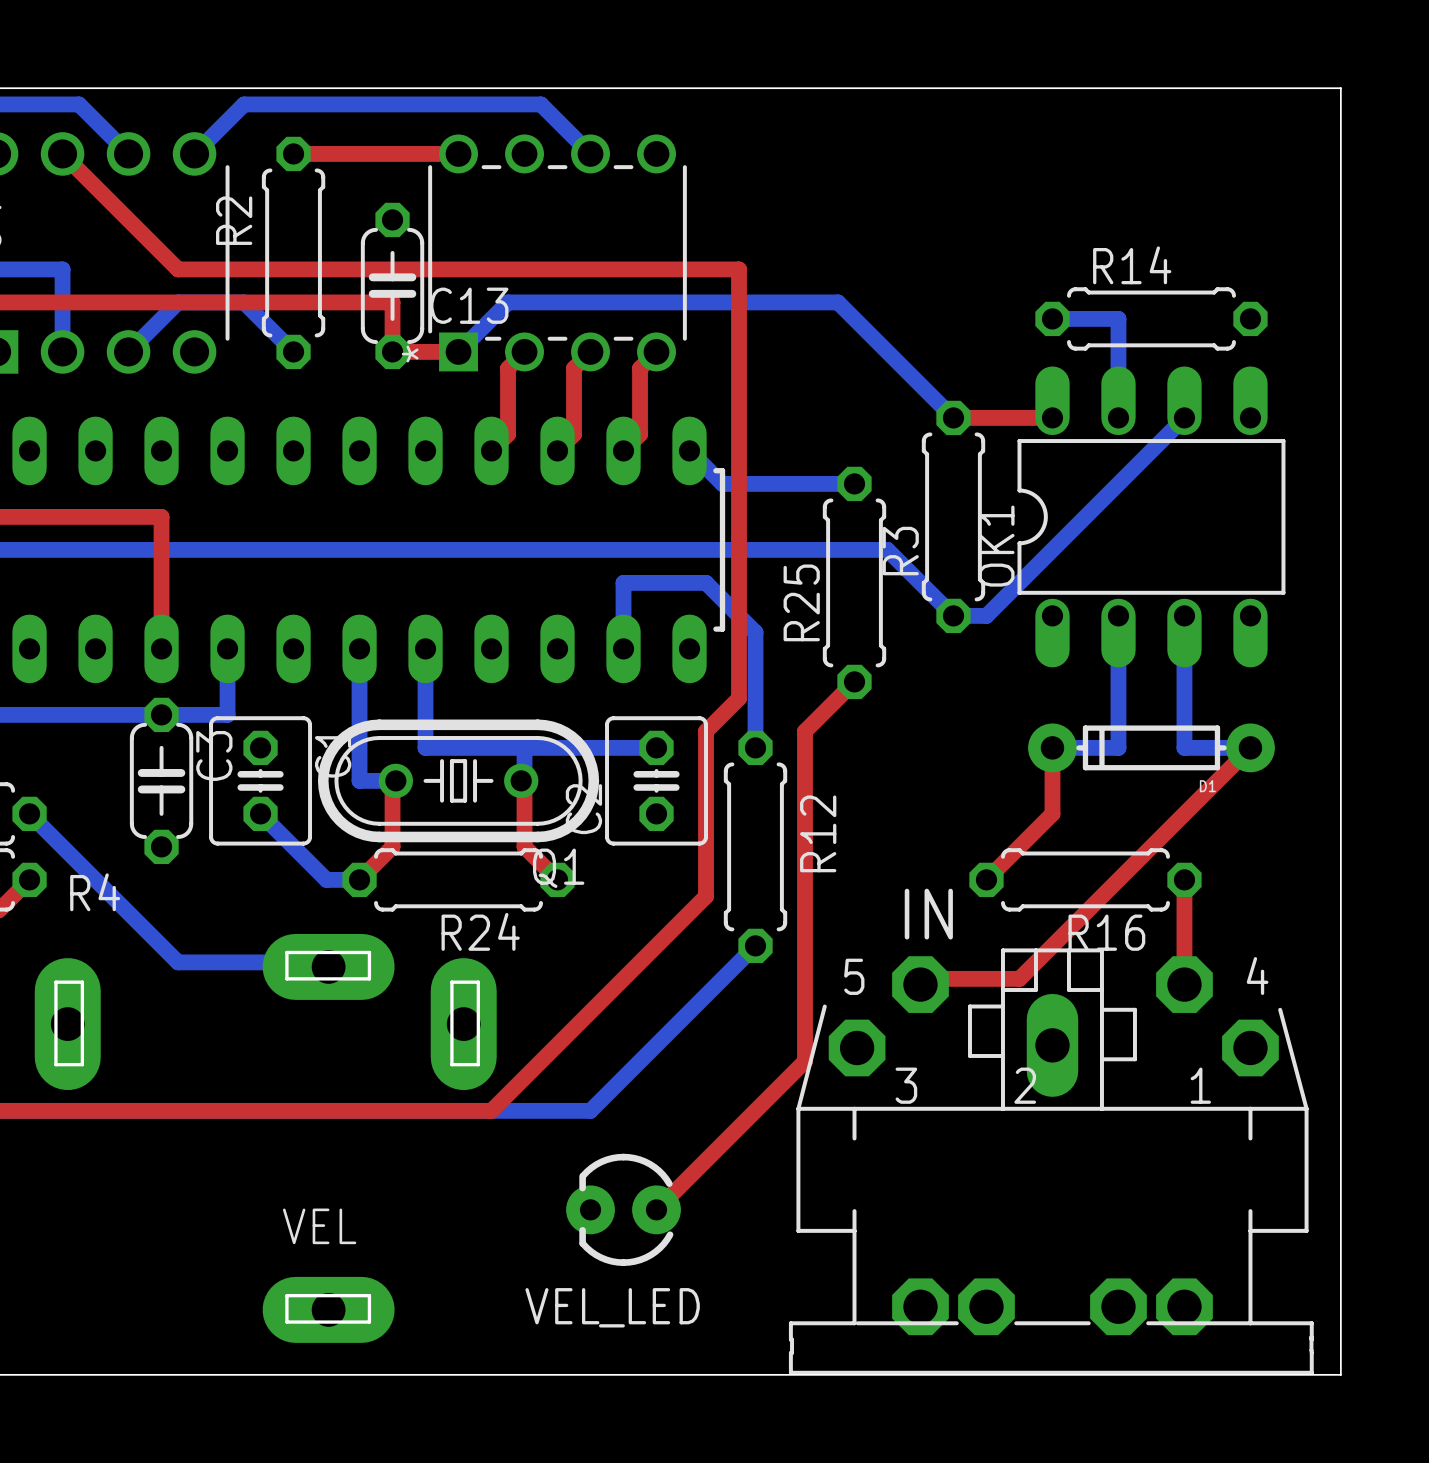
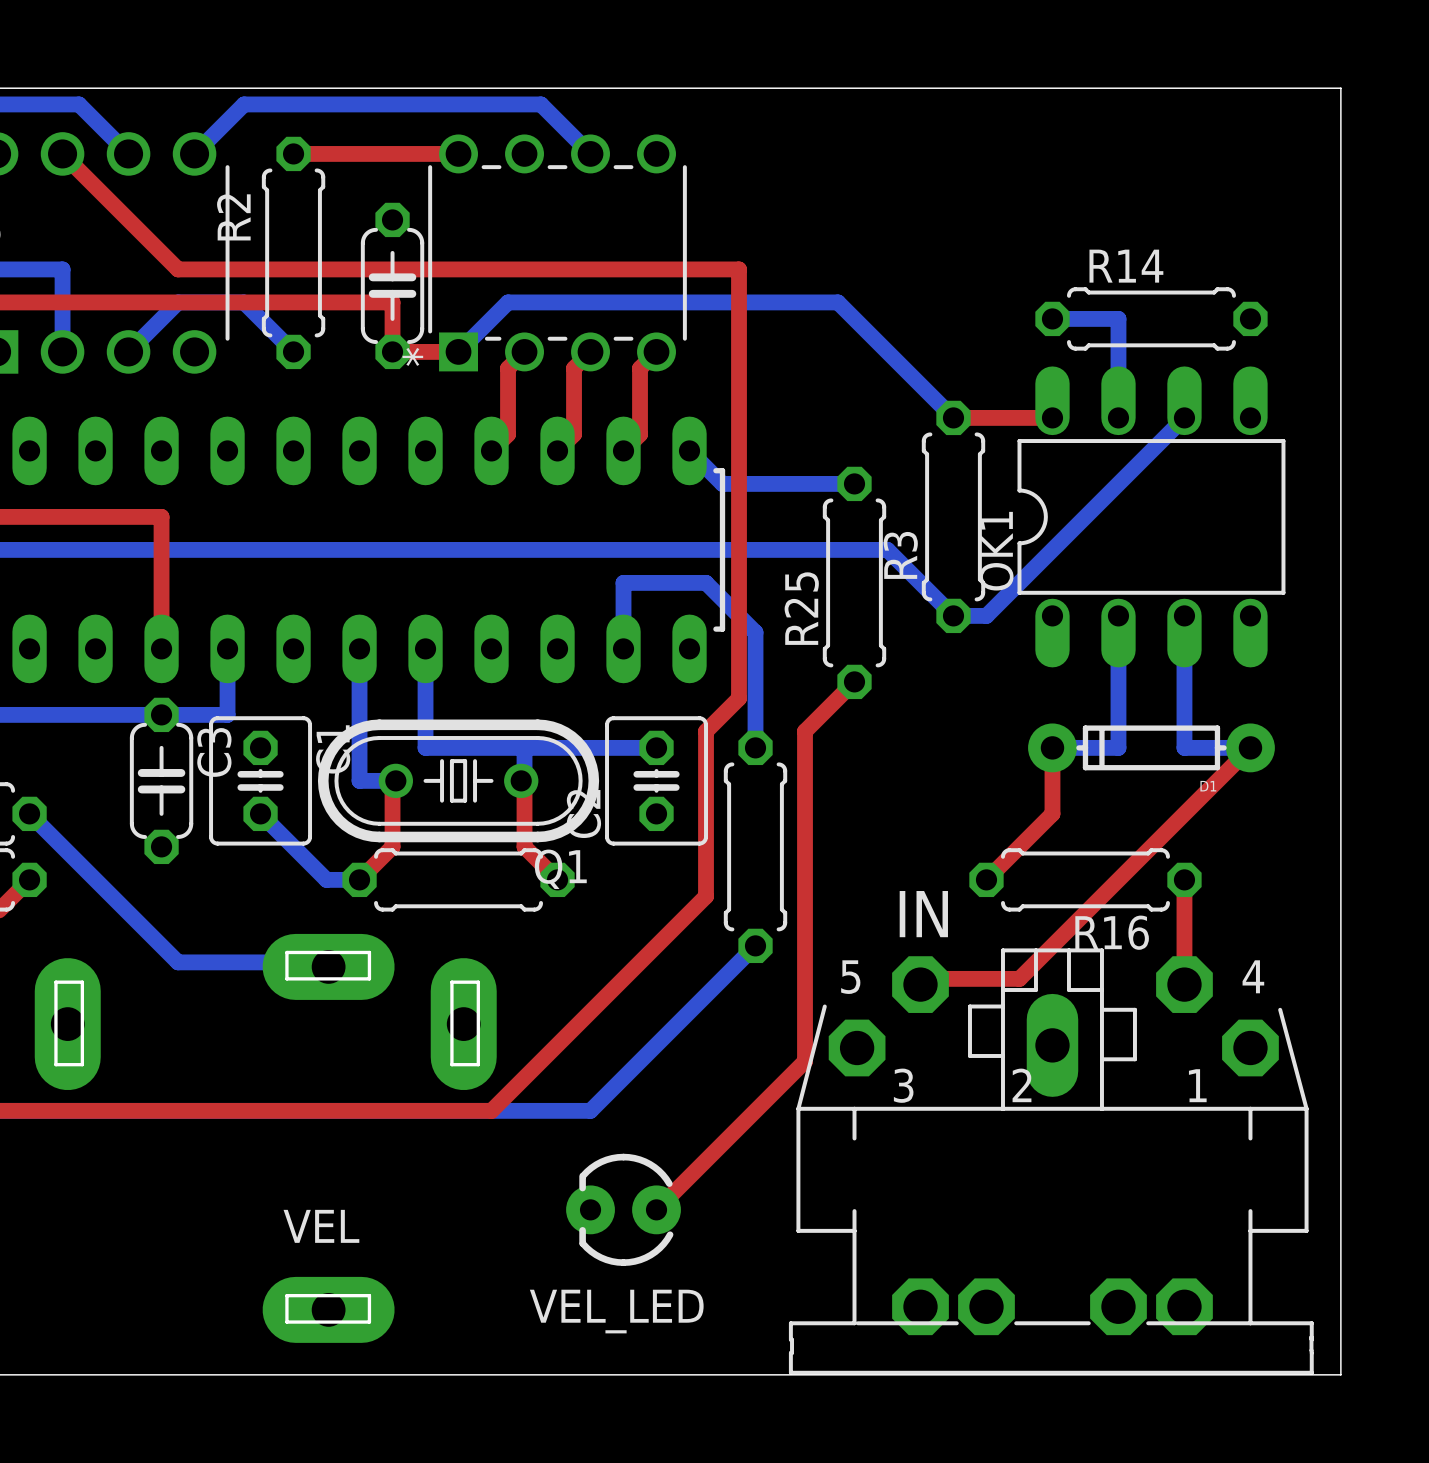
C13 name: C13 (469, 305) -> none
R12 name: R12 (818, 833) -> none
R4 name: R4 (95, 892) -> none
R24 name: R24 (480, 931) -> none

